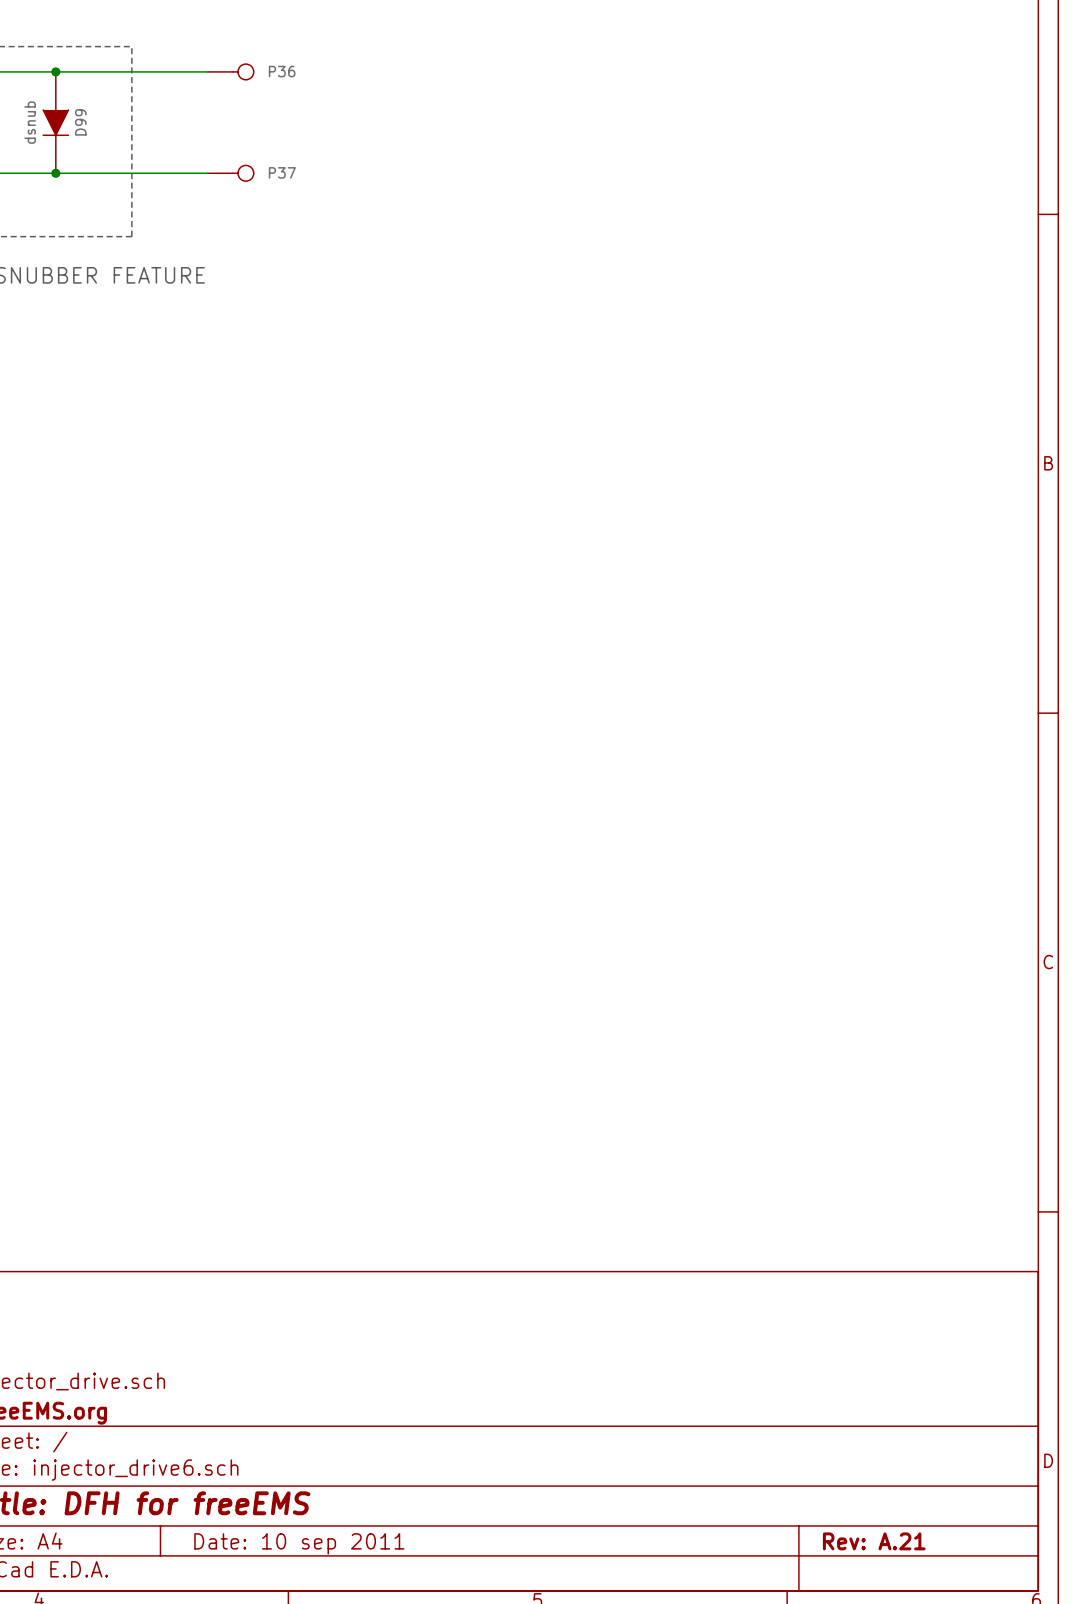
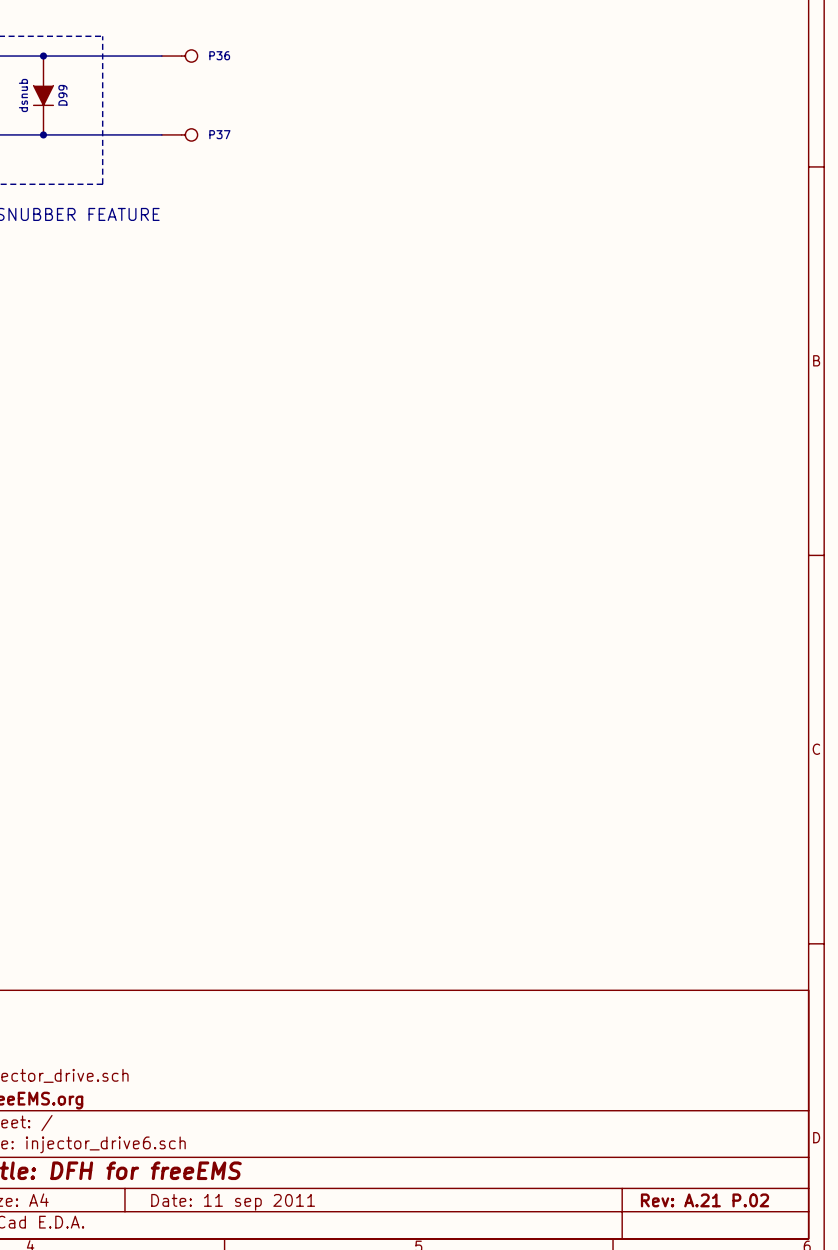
title block: Rev: A.21 (874, 1541) -> Rev: A.21 P.02 (705, 1200)
title block: Date: 10 sep 2011 (299, 1543) -> Date: 11 sep 2011 (233, 1202)

